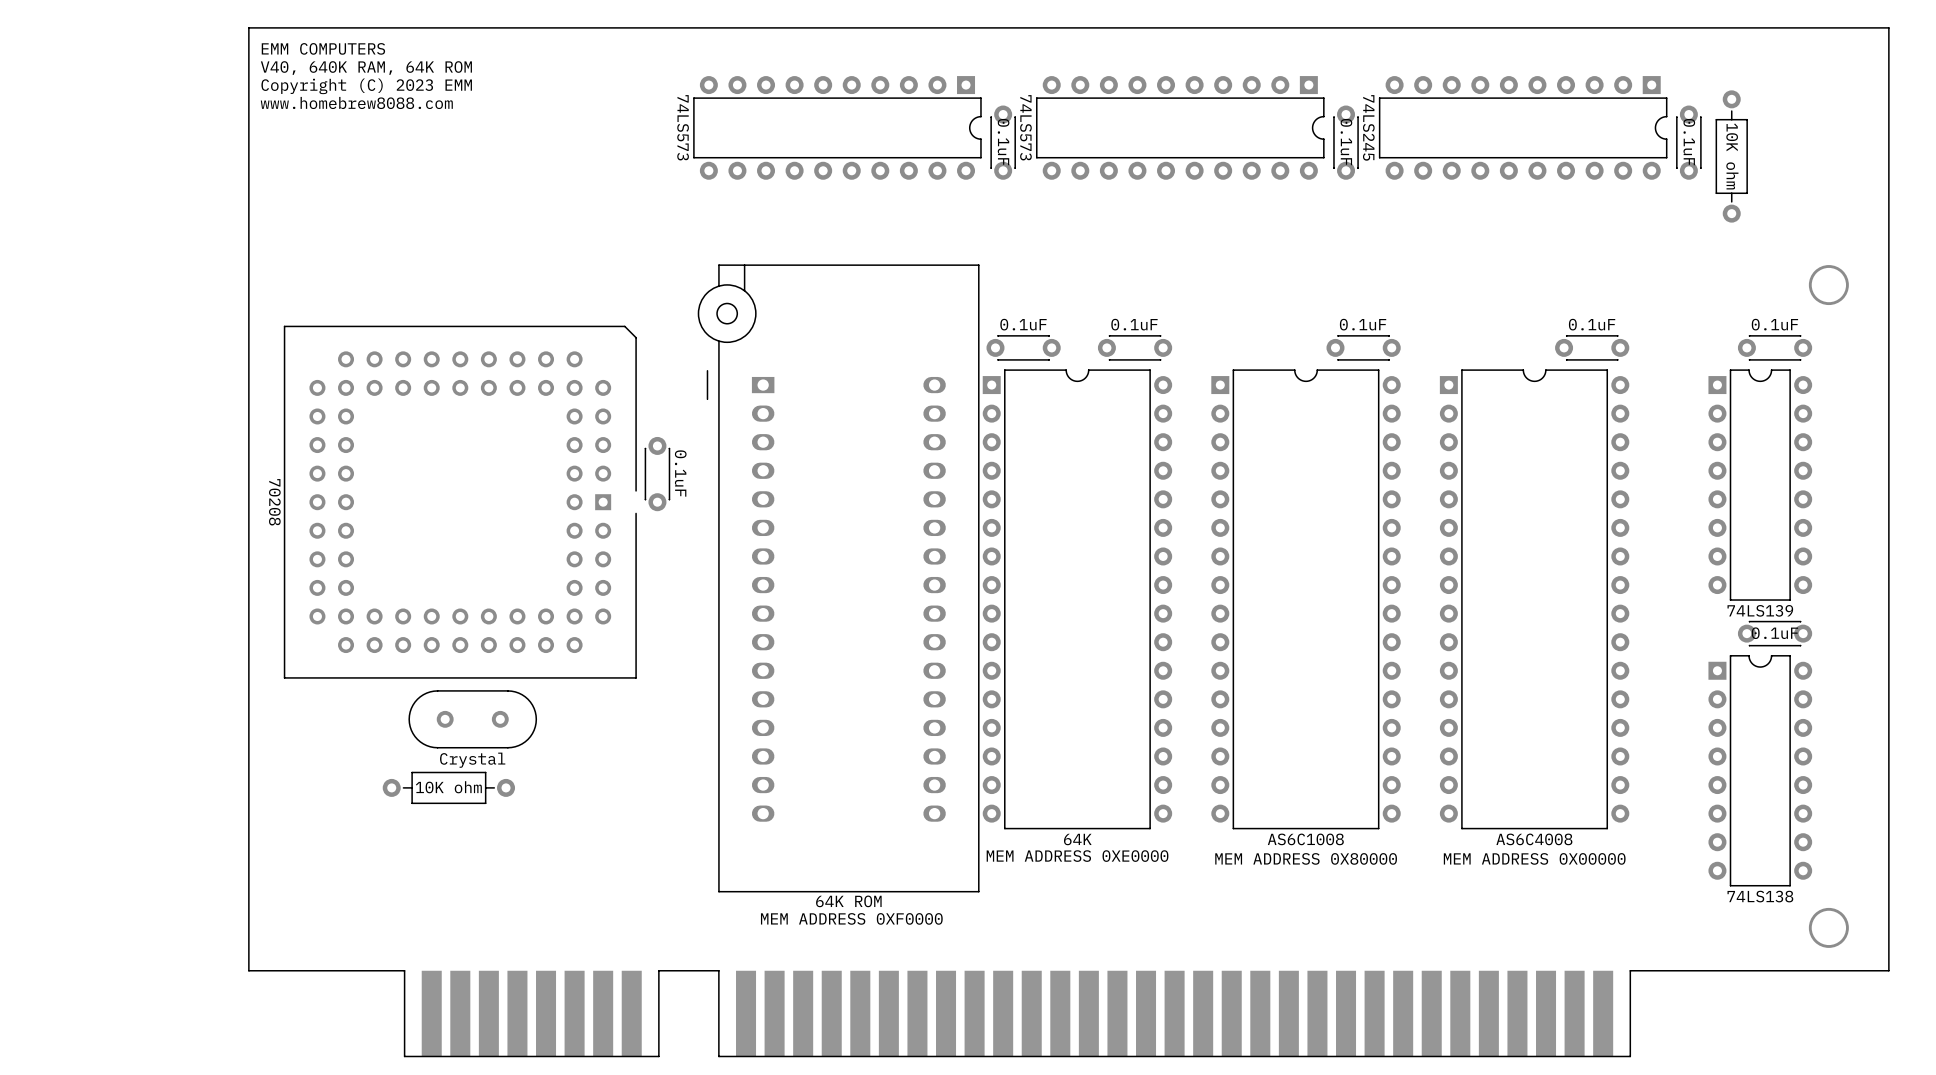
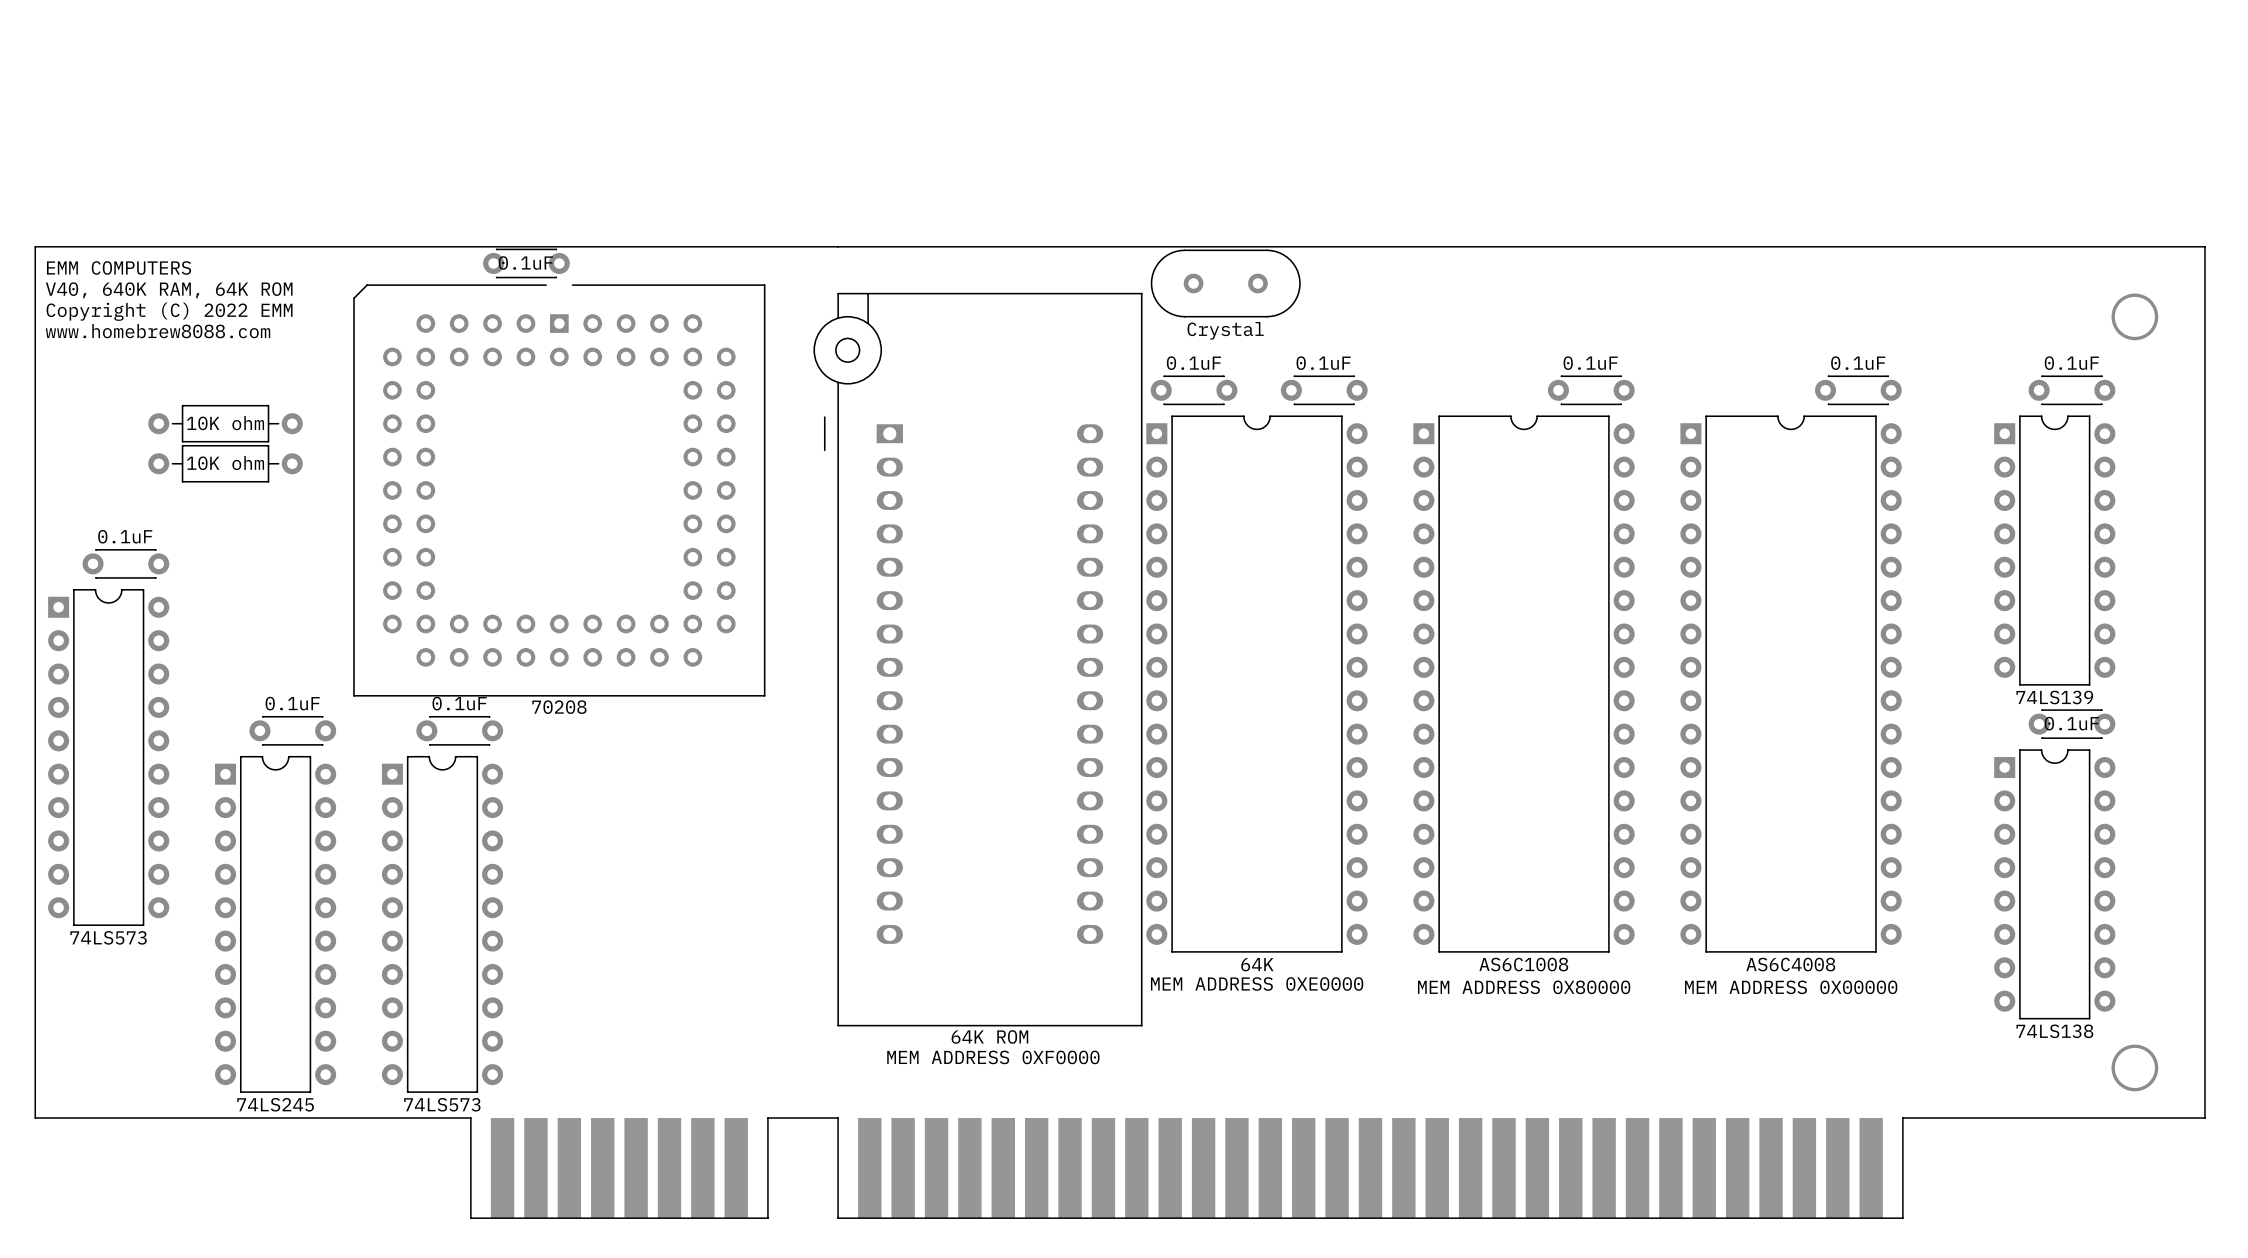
text: EMM COMPUTERS (323, 48) -> none
text: V40, 640K RAM, 64K ROM (366, 68) -> none
text: Copyright (C) 2023 EMM (366, 86) -> none
text: www.homebrew8088.com (356, 102) -> none
part: 74LS573 (837, 127) -> none
part: 74LS573 (1180, 127) -> none
part: 74LS245 (1523, 127) -> none
part: 0.1uF (1003, 142) -> none
part: 0.1uF (1346, 142) -> none
part: 0.1uF (1688, 142) -> none
part: 10K ohm (1731, 156) -> none
board edge: (1888, 225) (1888, 27) (248, 27) (248, 970) -> (2204, 246) (35, 246) (35, 1118) (288, 1118)
part: none -> 0.1uF (526, 263)
text: none -> EMM COMPUTERS (119, 267)
part: none -> Crystal (1225, 283)
text: none -> V40, 640K RAM, 64K ROM (169, 290)
text: none -> Copyright (C) 2022 EMM (169, 311)
text: none -> www.homebrew8088.com (158, 331)
part: none -> 10K ohm (225, 423)
part: none -> 10K ohm (225, 463)
part: 0.1uF (657, 474) -> none
part: none -> 0.1uF (125, 563)
part rotation: 0° (460, 502) -> 90° counterclockwise (559, 490)
part: none -> 0.1uF (292, 730)
part: none -> 0.1uF (459, 730)
part: none -> 74LS573 (108, 757)
part: Crystal (472, 719) -> none
part: 10K ohm (448, 787) -> none
part: none -> 74LS245 (275, 924)
part: none -> 74LS573 (442, 924)

